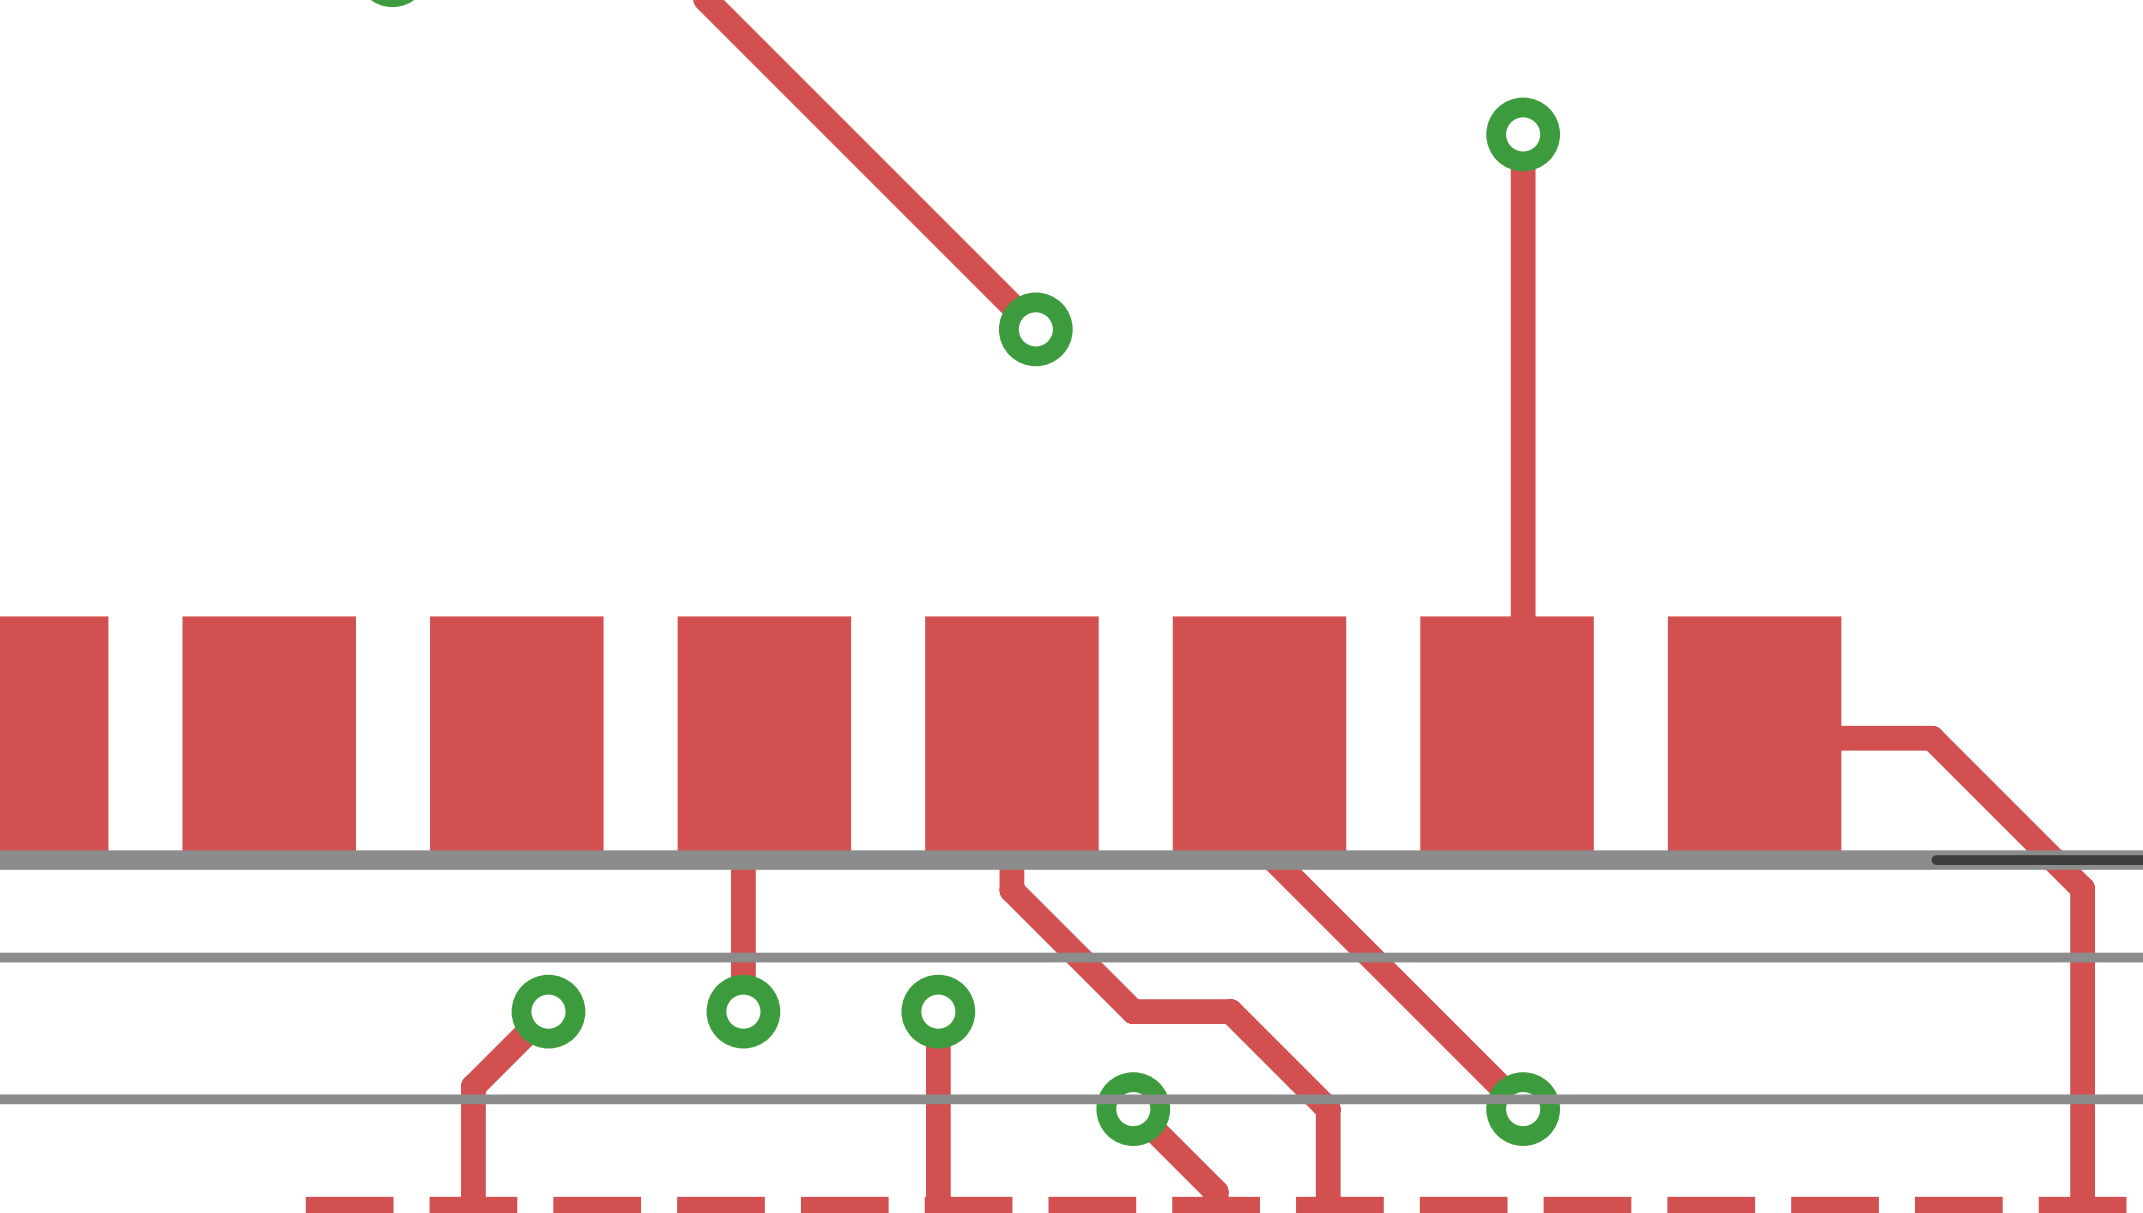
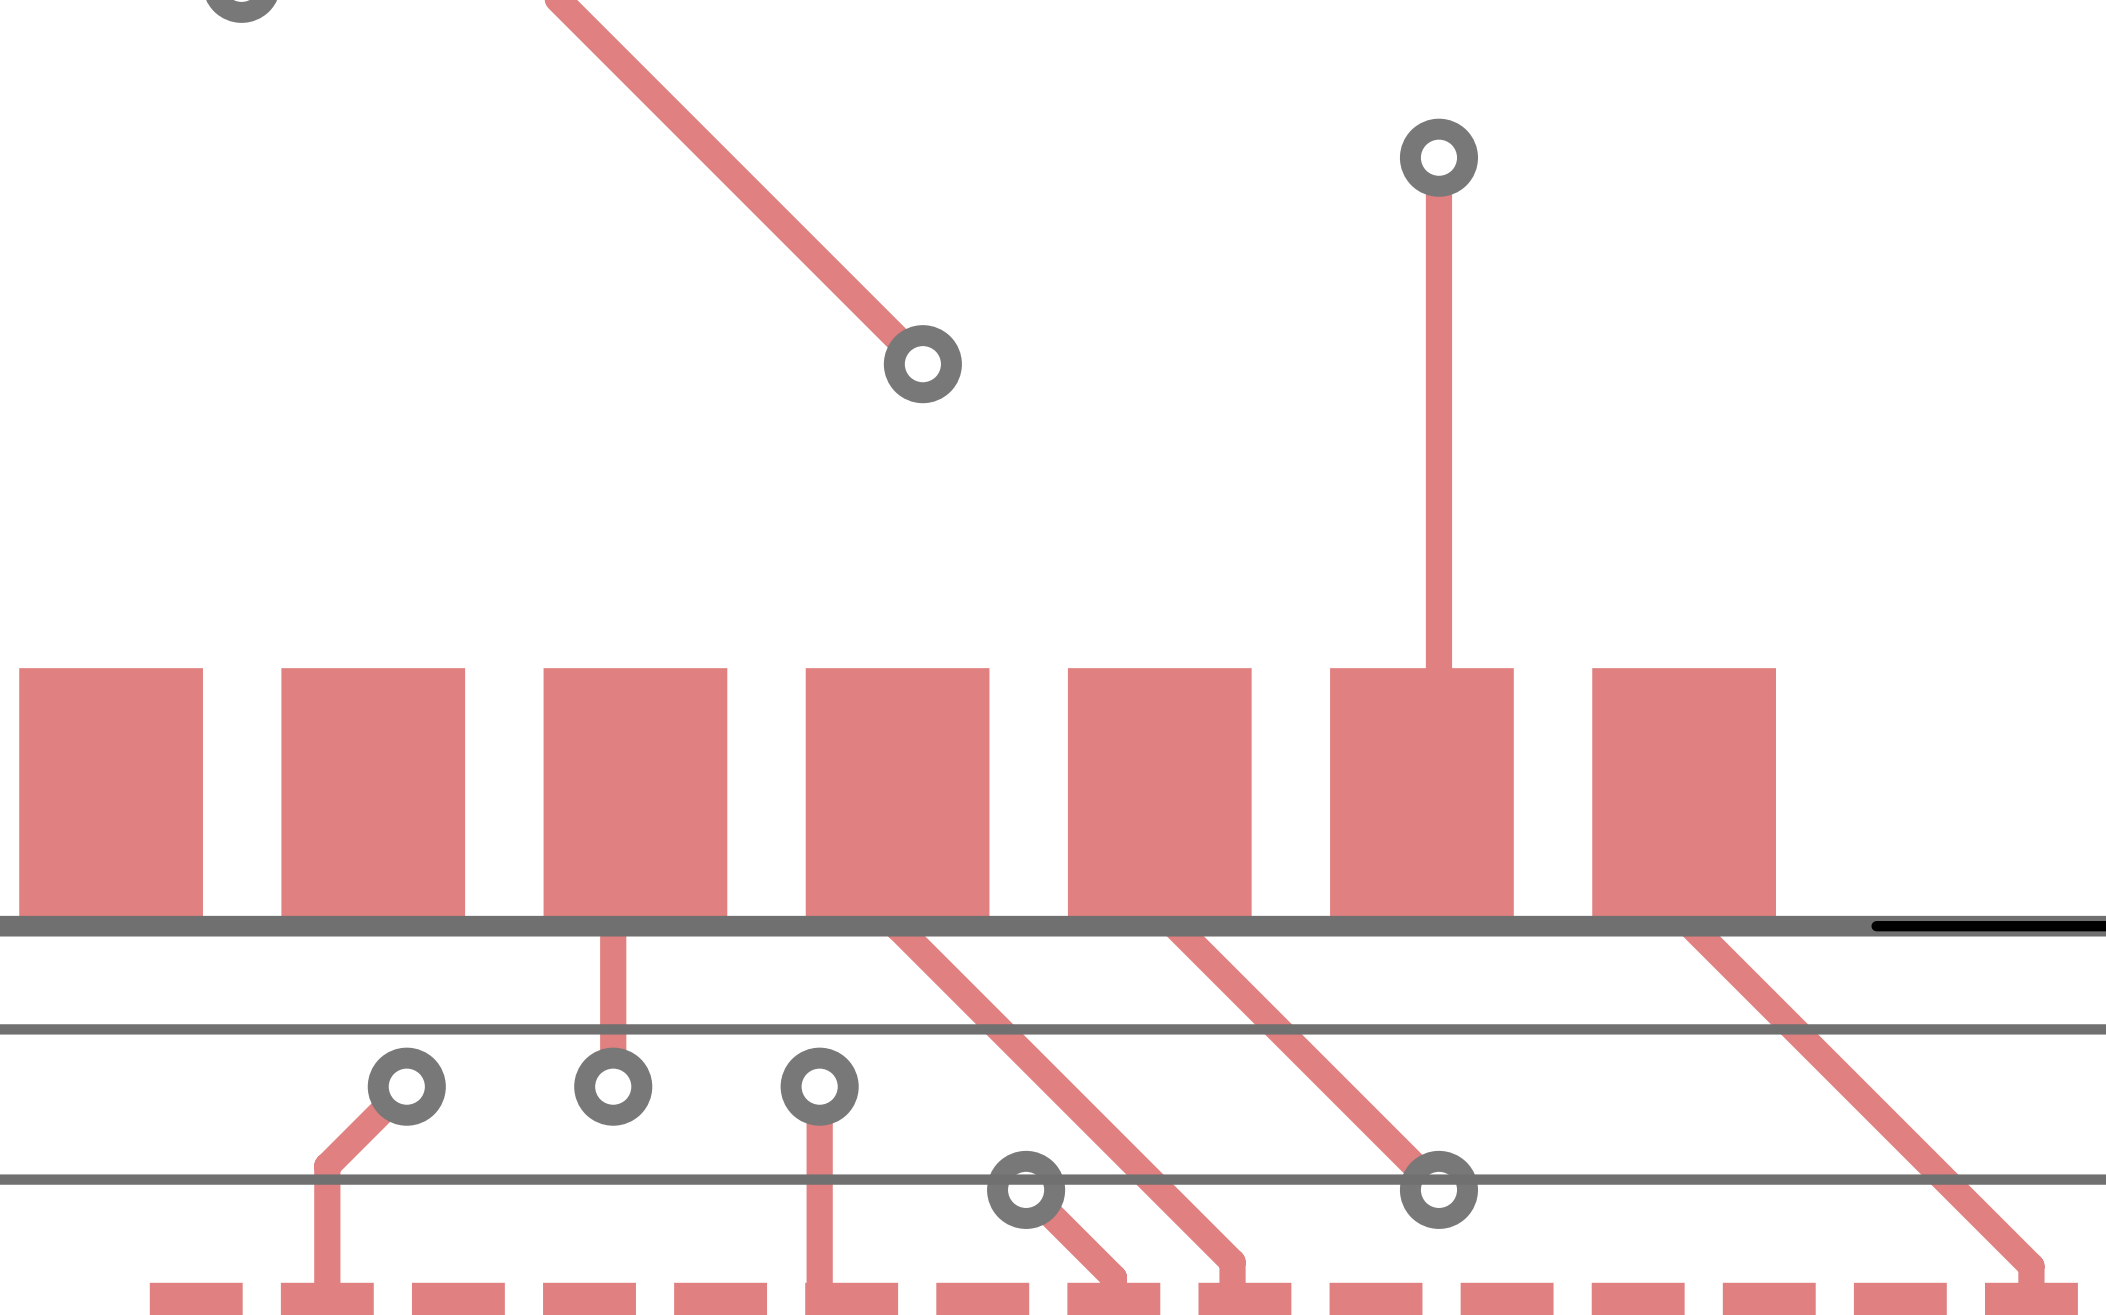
track: (1754, 738) (1932, 738) (2082, 888) (2082, 1181) -> (1684, 797) (1684, 918) (2031, 1266)
track: (1011, 861) (1011, 890) (1133, 1011) (1230, 1011) (1328, 1109) (1328, 1177) -> (897, 927) (1232, 1262)

